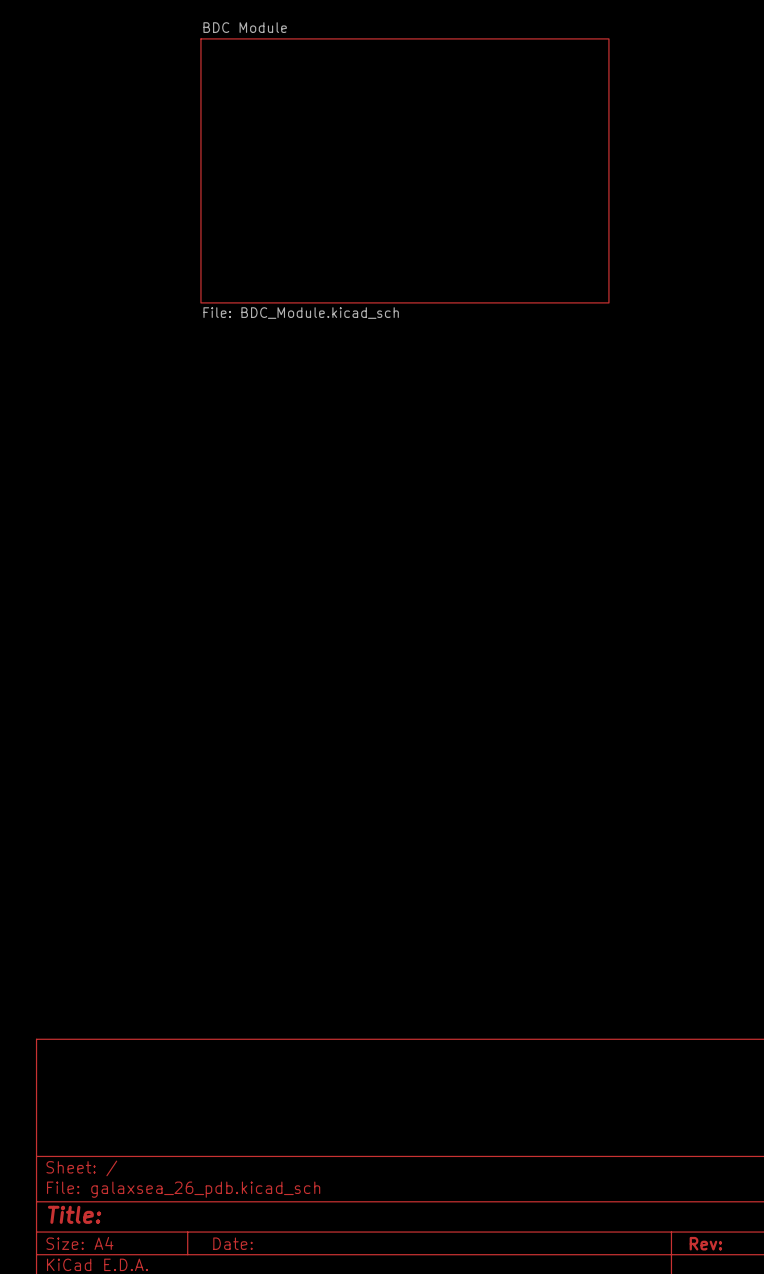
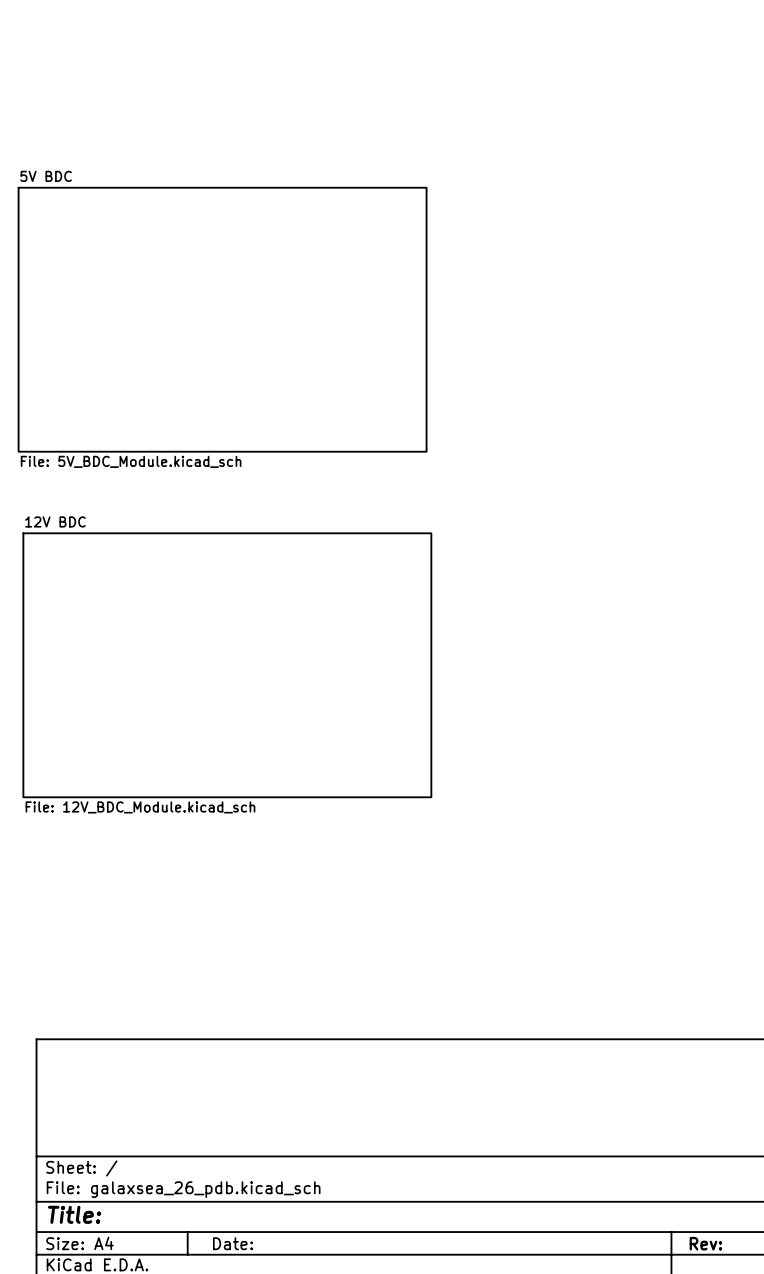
sheet BDC Module: File: BDC_Module.kicad_sch (404, 170) -> none
sheet 5V BDC: none -> File: 5V_BDC_Module.kicad_sch (222, 319)
sheet 12V BDC: none -> File: 12V_BDC_Module.kicad_sch (227, 665)

